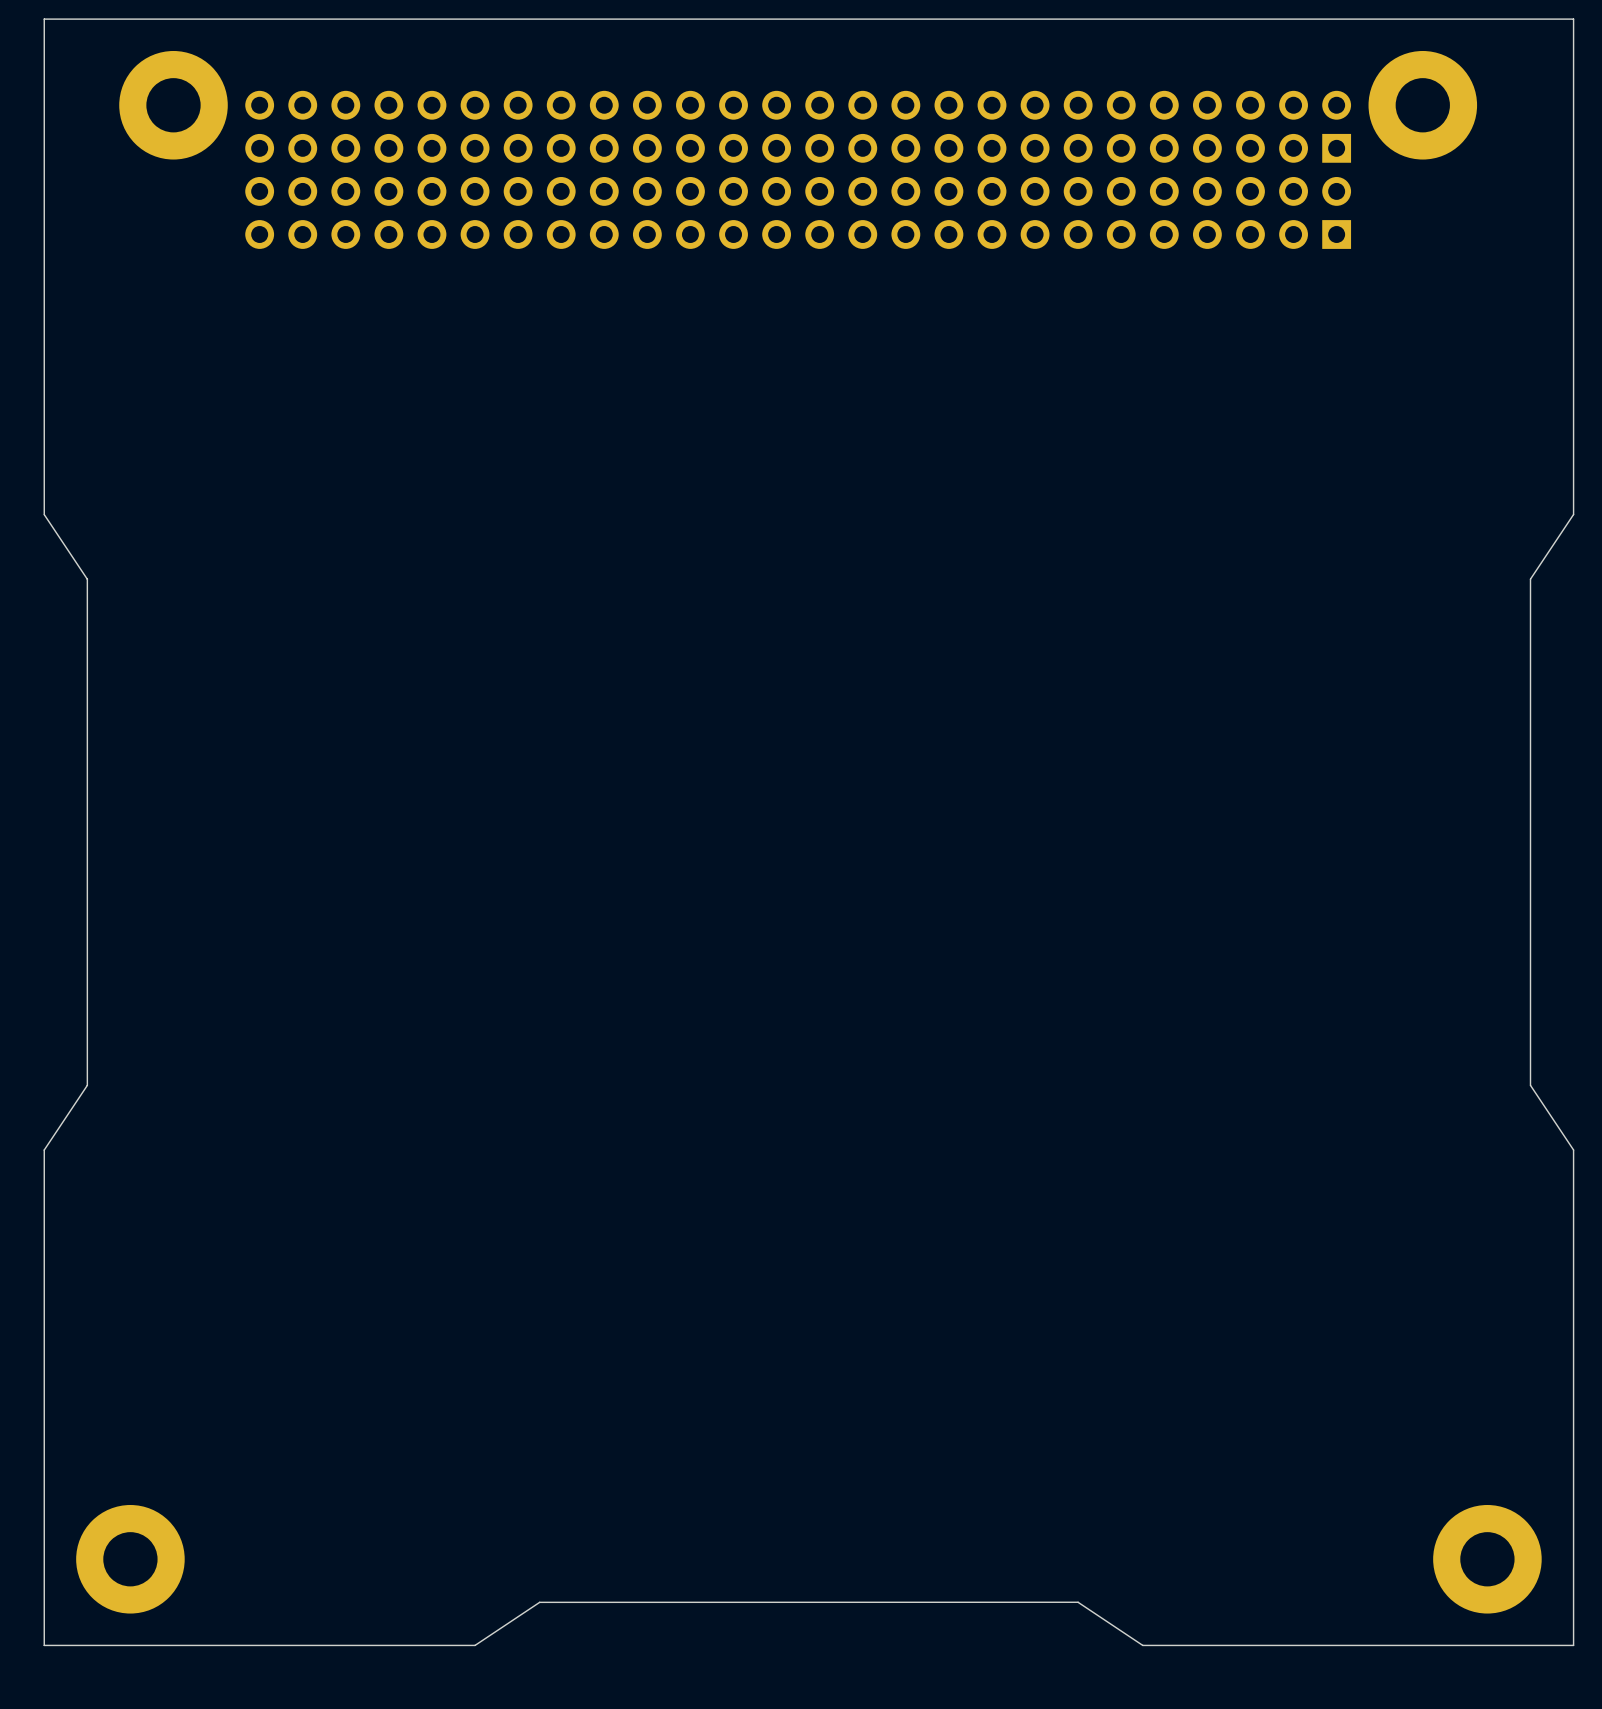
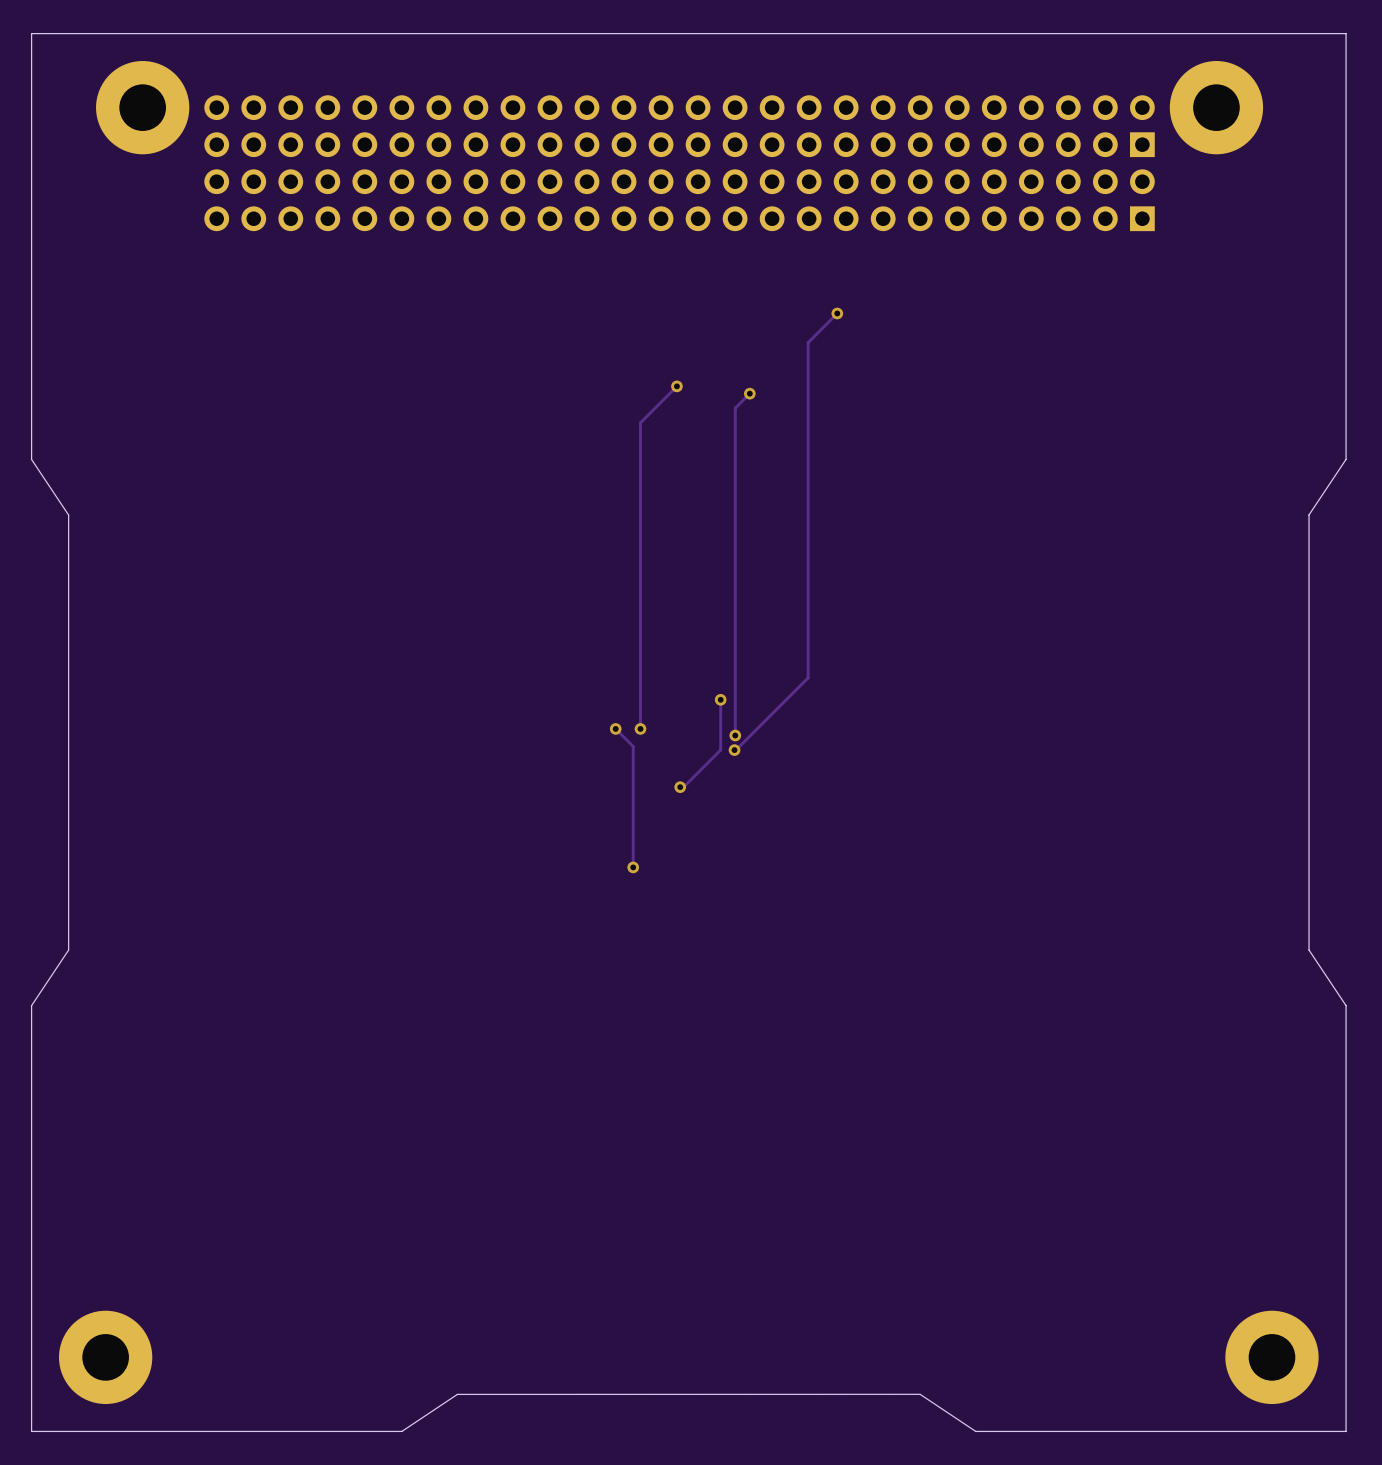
track: none -> (837, 313) (808, 342) (808, 677) (734, 750)
via: none -> (837, 313)
track: none -> (676, 386) (640, 422) (640, 728)
via: none -> (676, 386)
track: none -> (749, 393) (735, 408) (735, 735)
via: none -> (749, 393)
track: none -> (720, 699) (720, 750) (683, 787) (680, 787)
via: none -> (720, 699)
track: none -> (615, 728) (633, 746) (633, 867)
via: none -> (615, 728)
via: none -> (640, 728)
via: none -> (735, 735)
via: none -> (734, 750)
via: none -> (680, 787)
via: none -> (633, 867)

